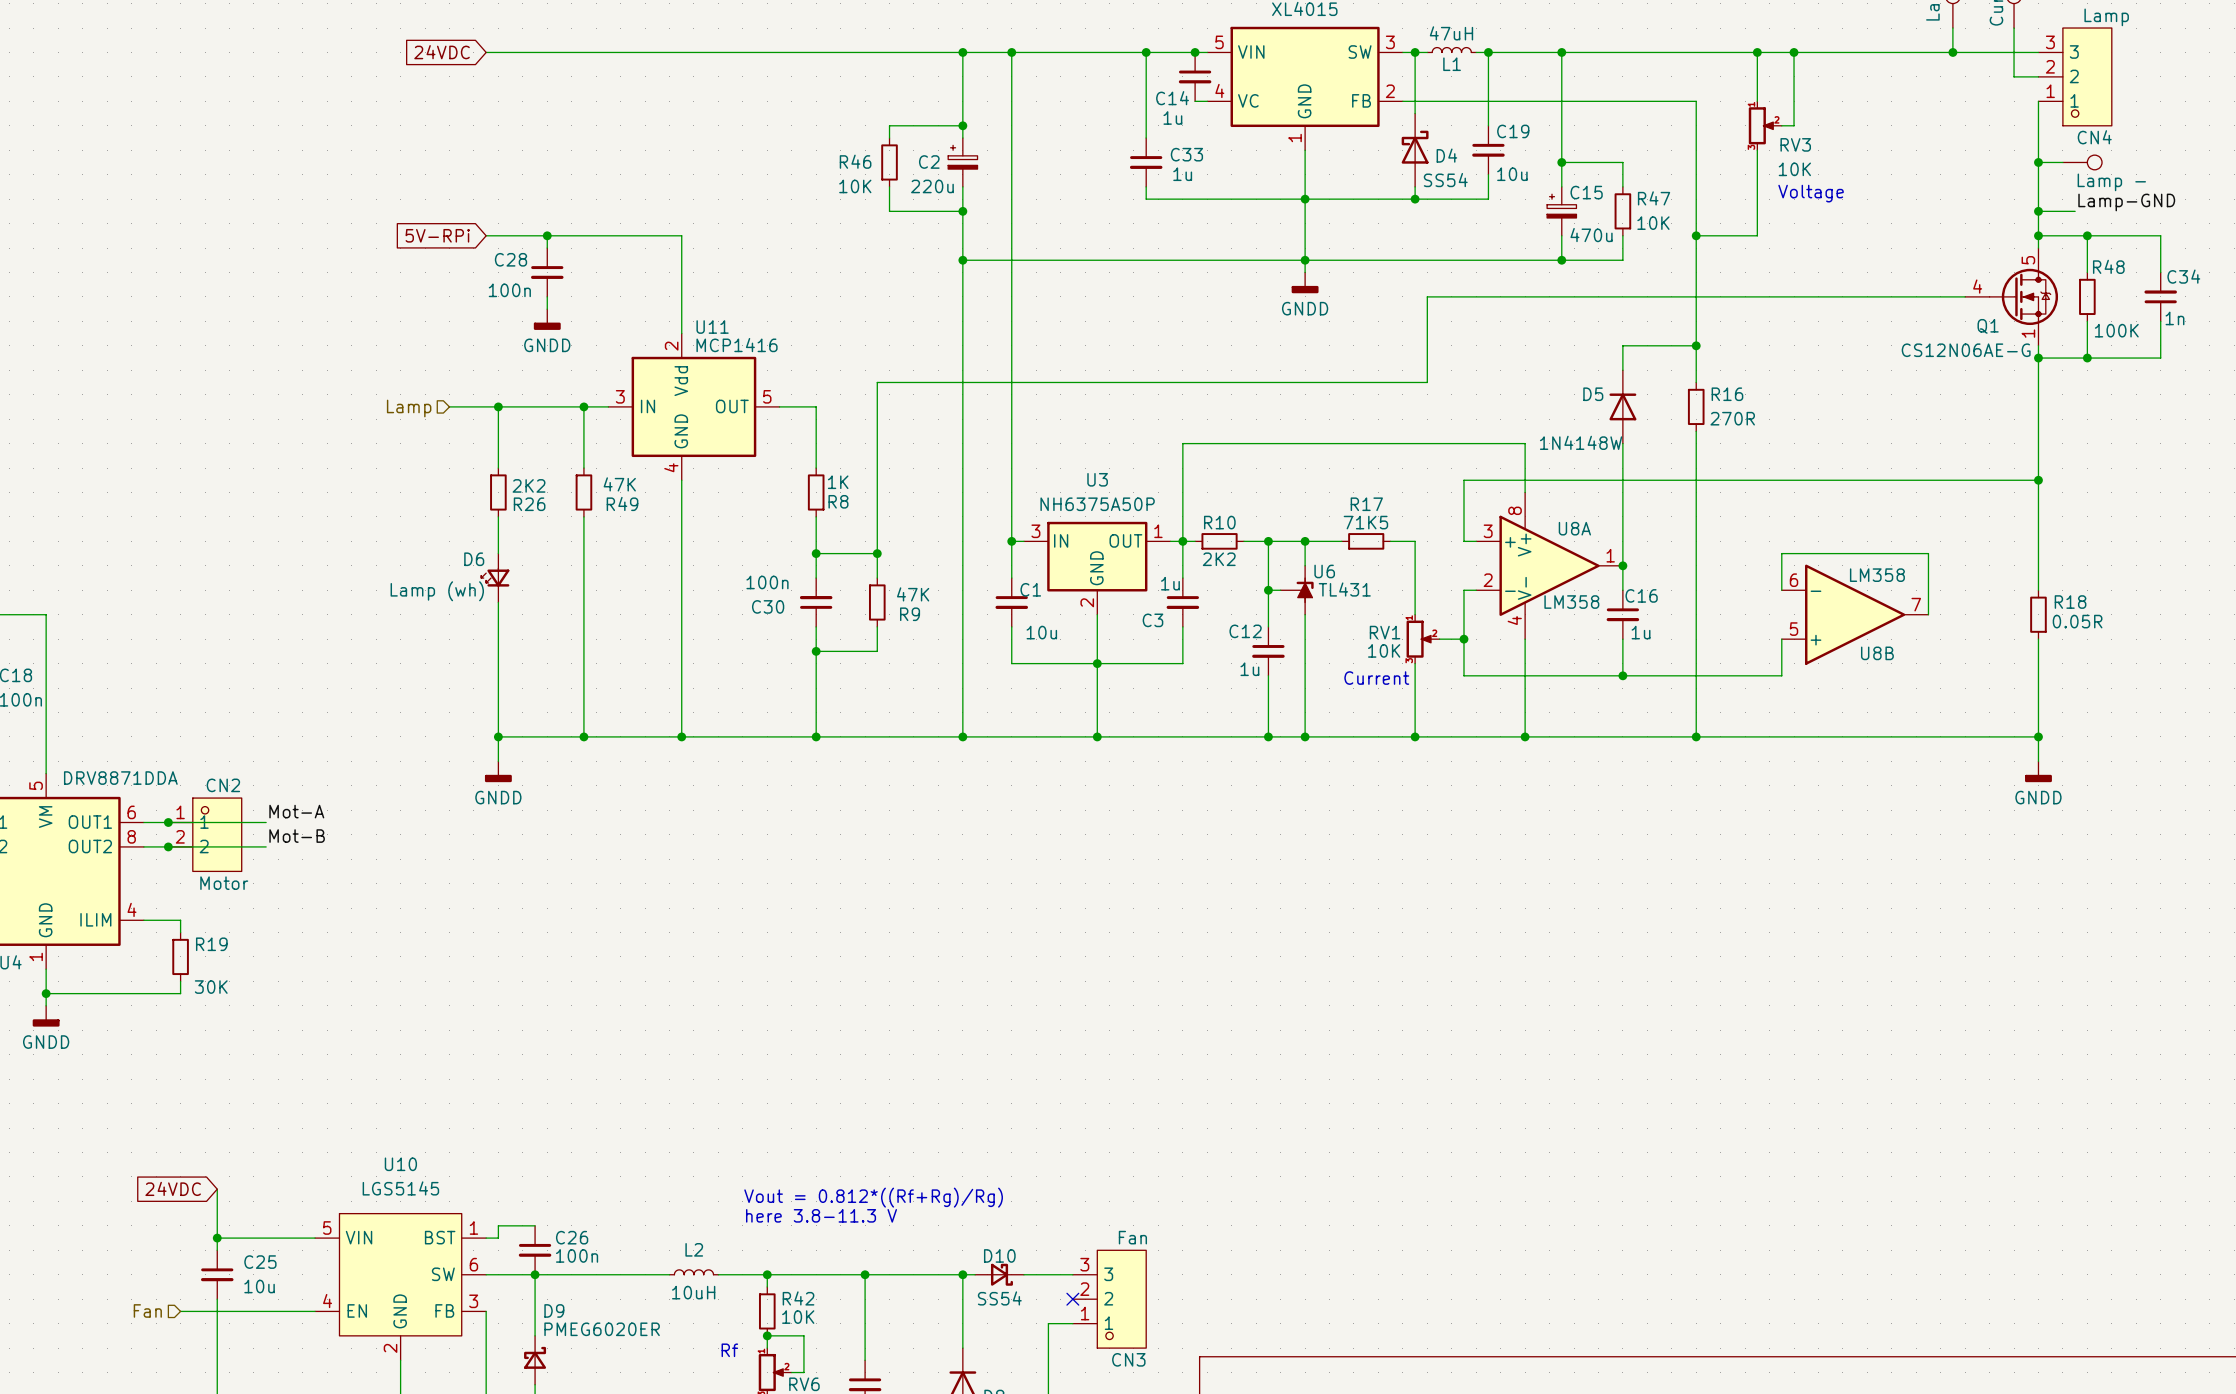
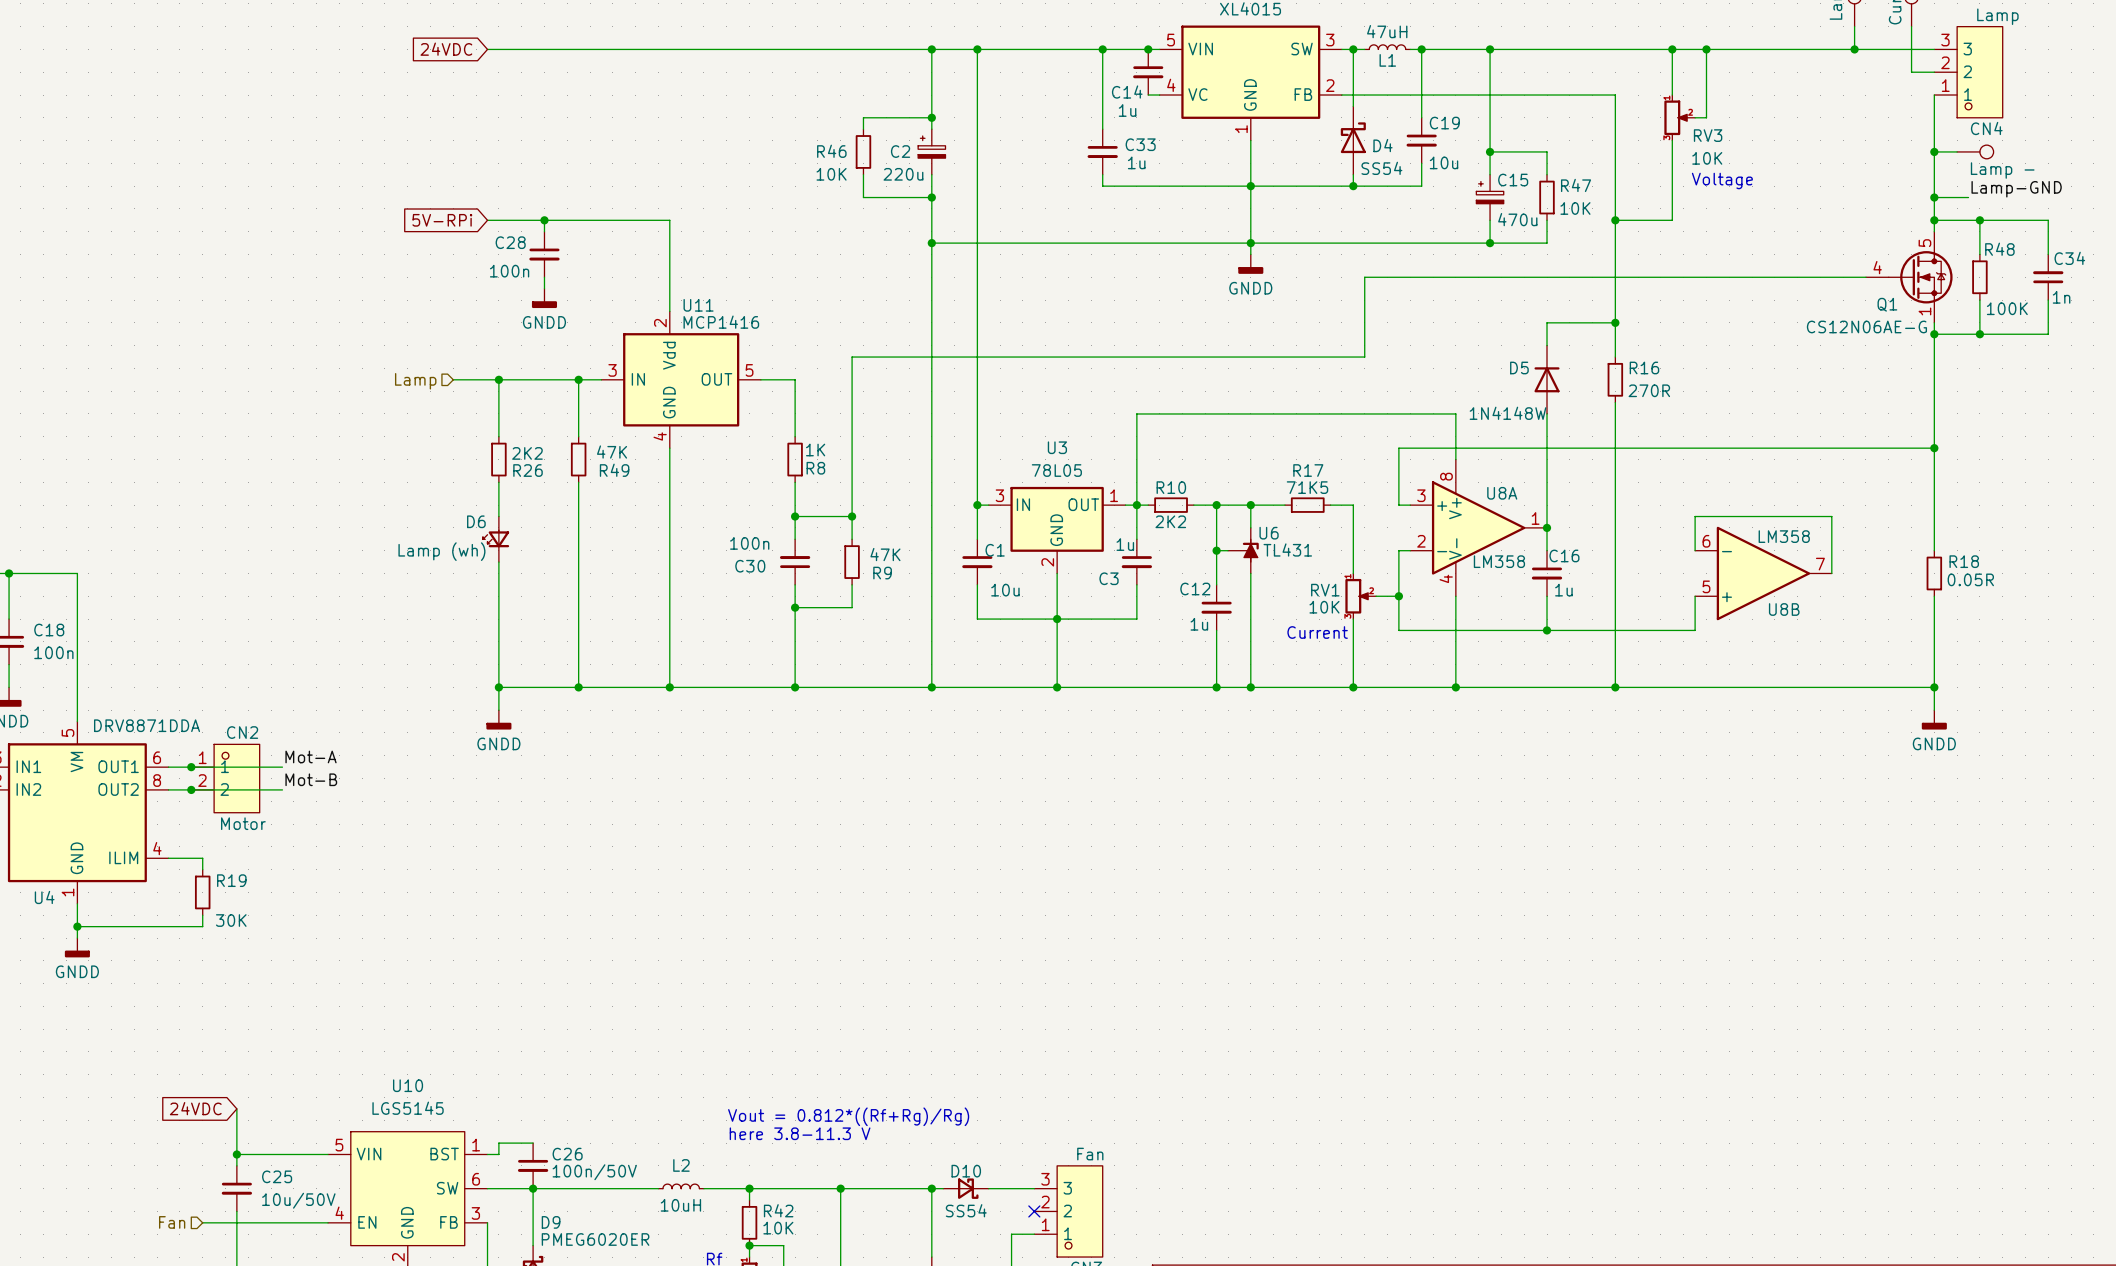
U3 value: NH6375A50P (1097, 504) -> 78L05 (1056, 470)
C26 value: 100n (577, 1255) -> 100n/50V (594, 1172)
C25 value: 10u (259, 1286) -> 10u/50V (298, 1200)

